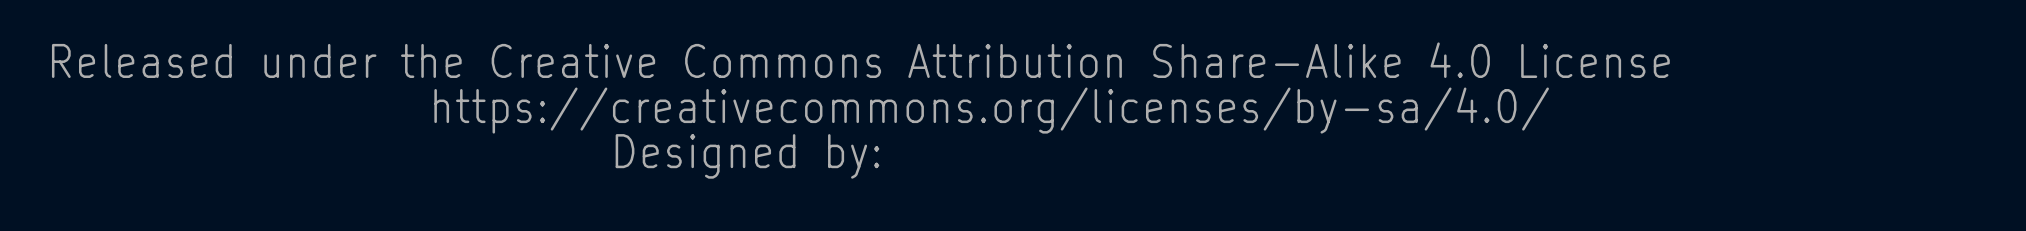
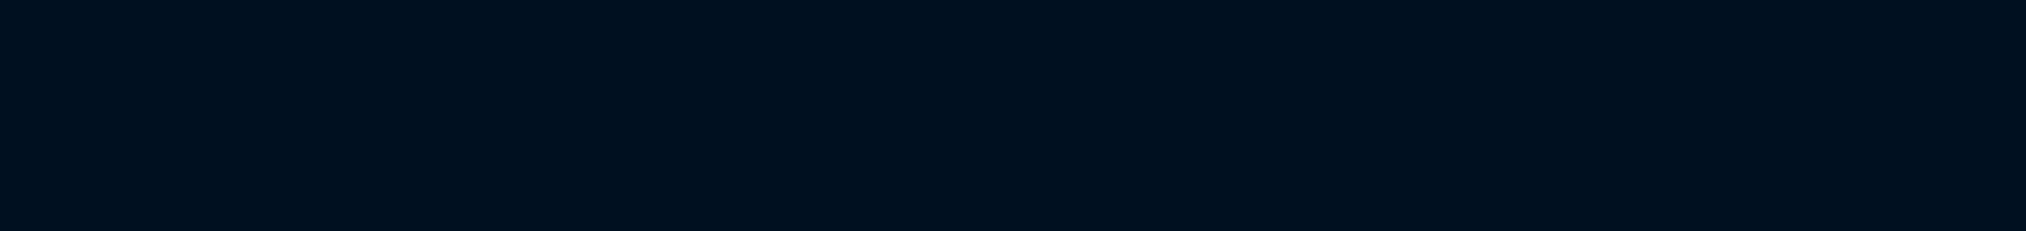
drawing: [51, 42, 1670, 179] -> none

